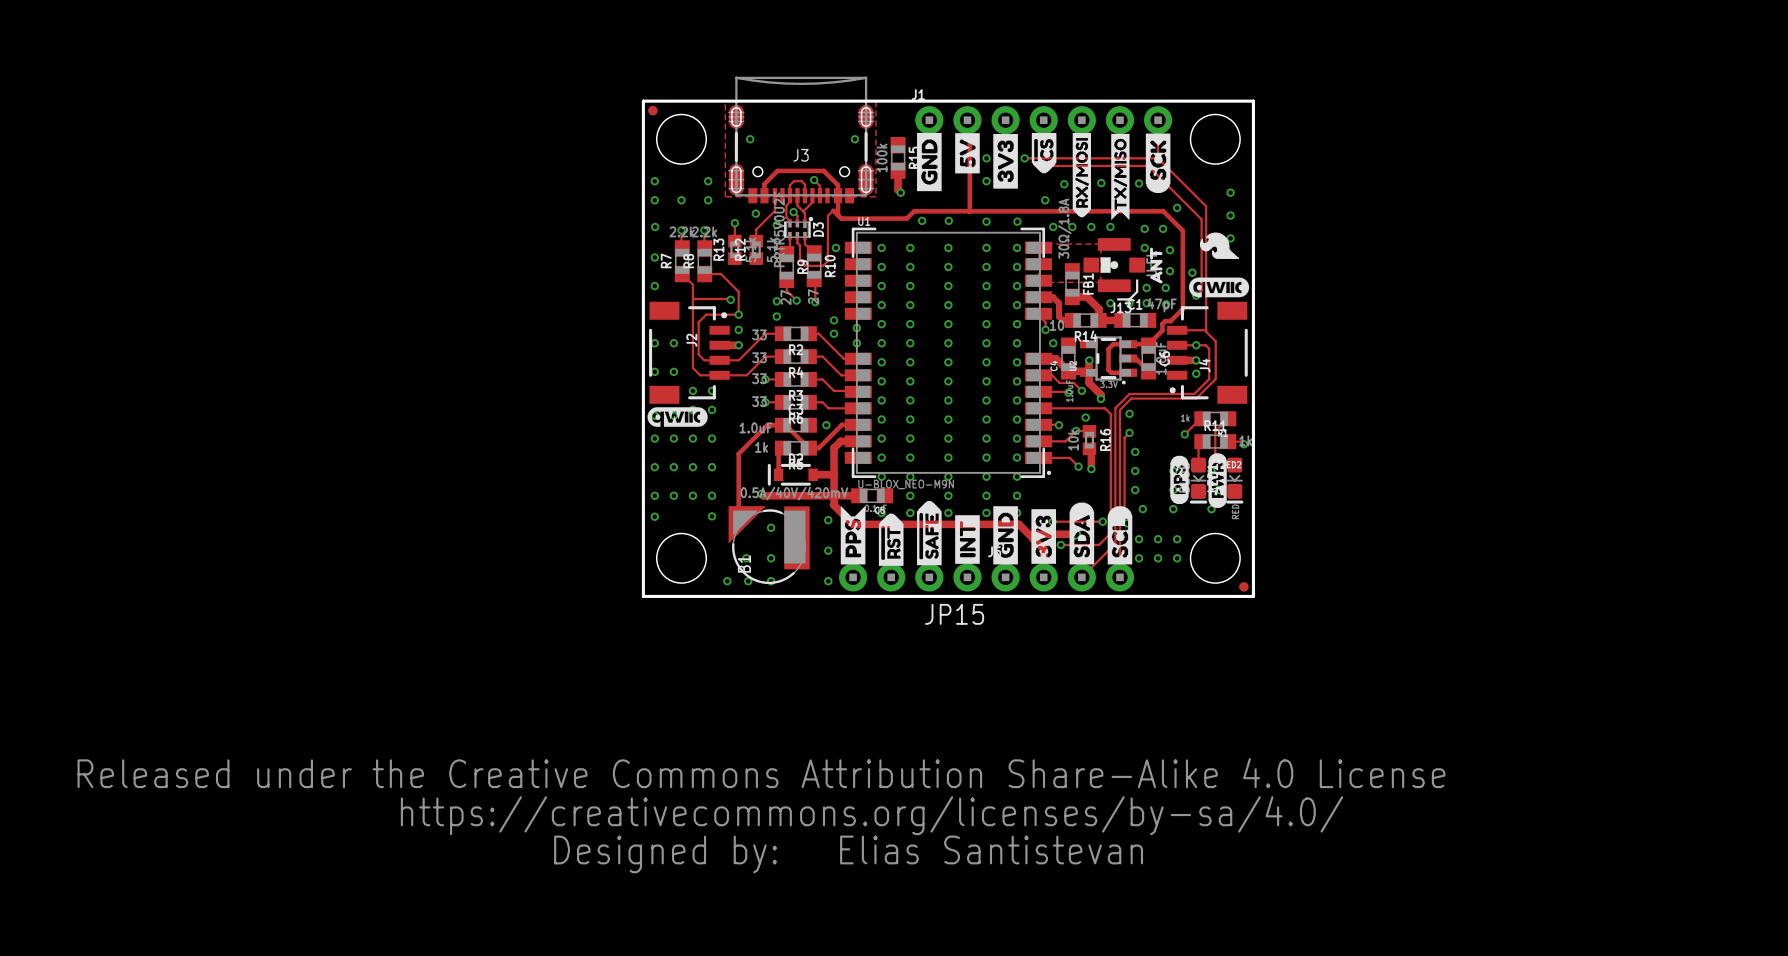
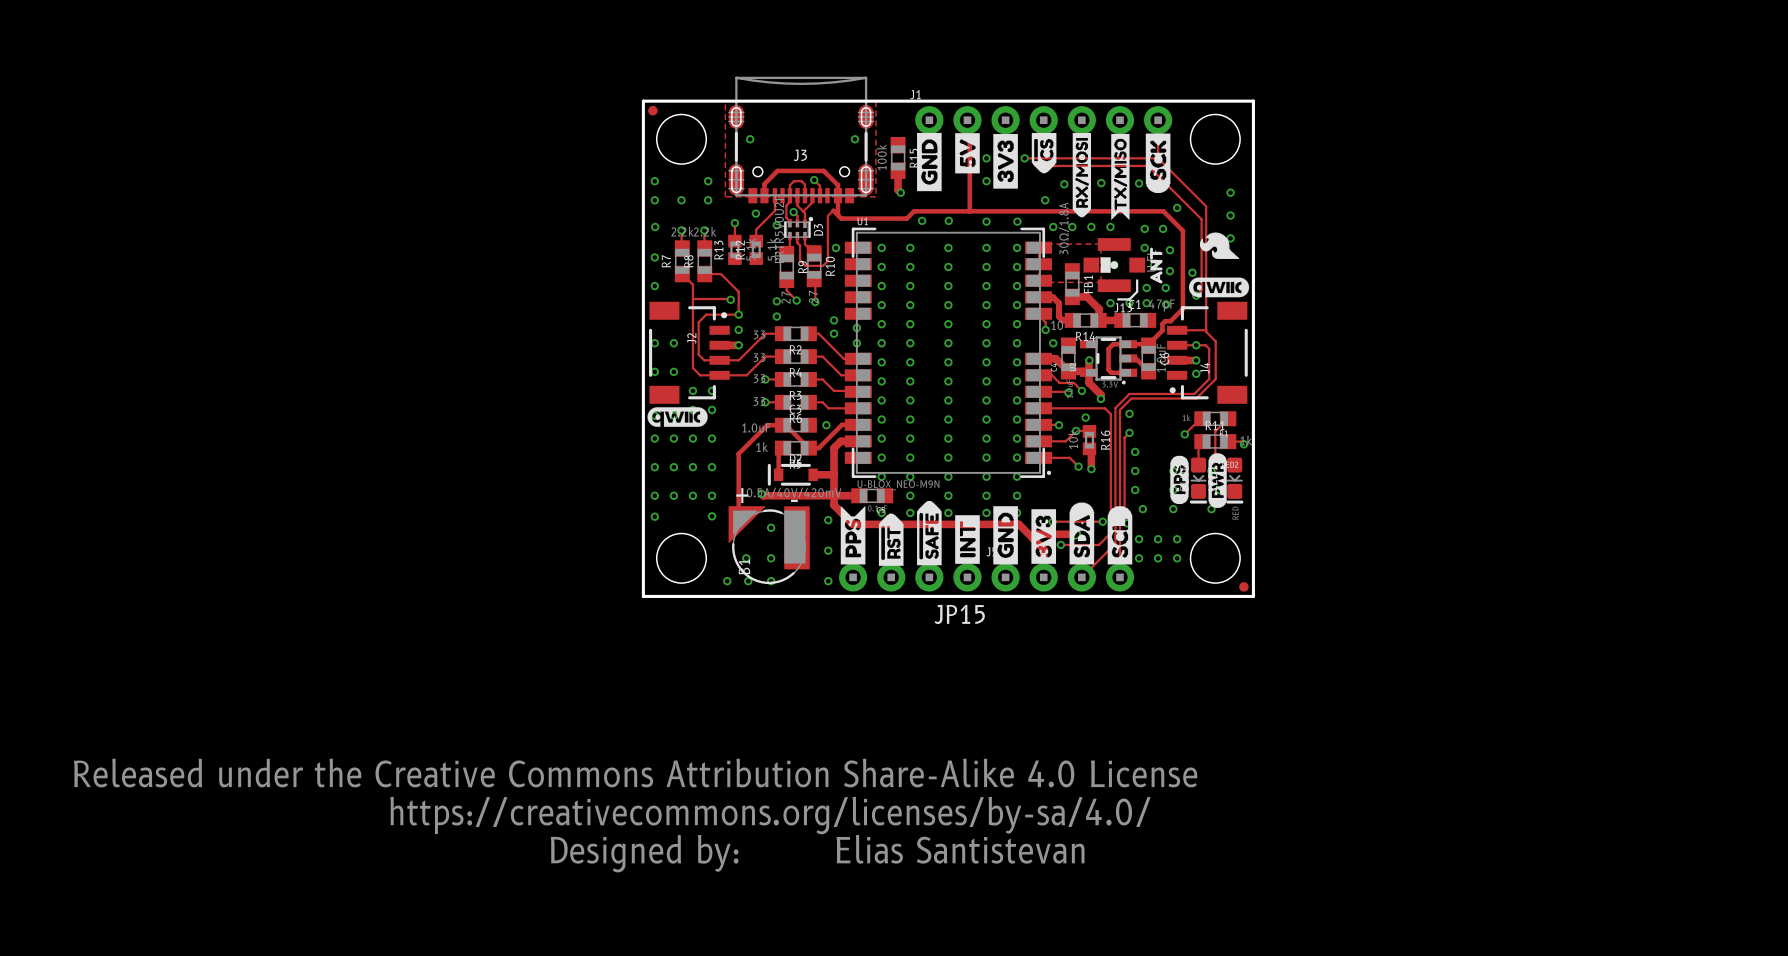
text: none -> + (742, 495)
text: none -> - (794, 500)

